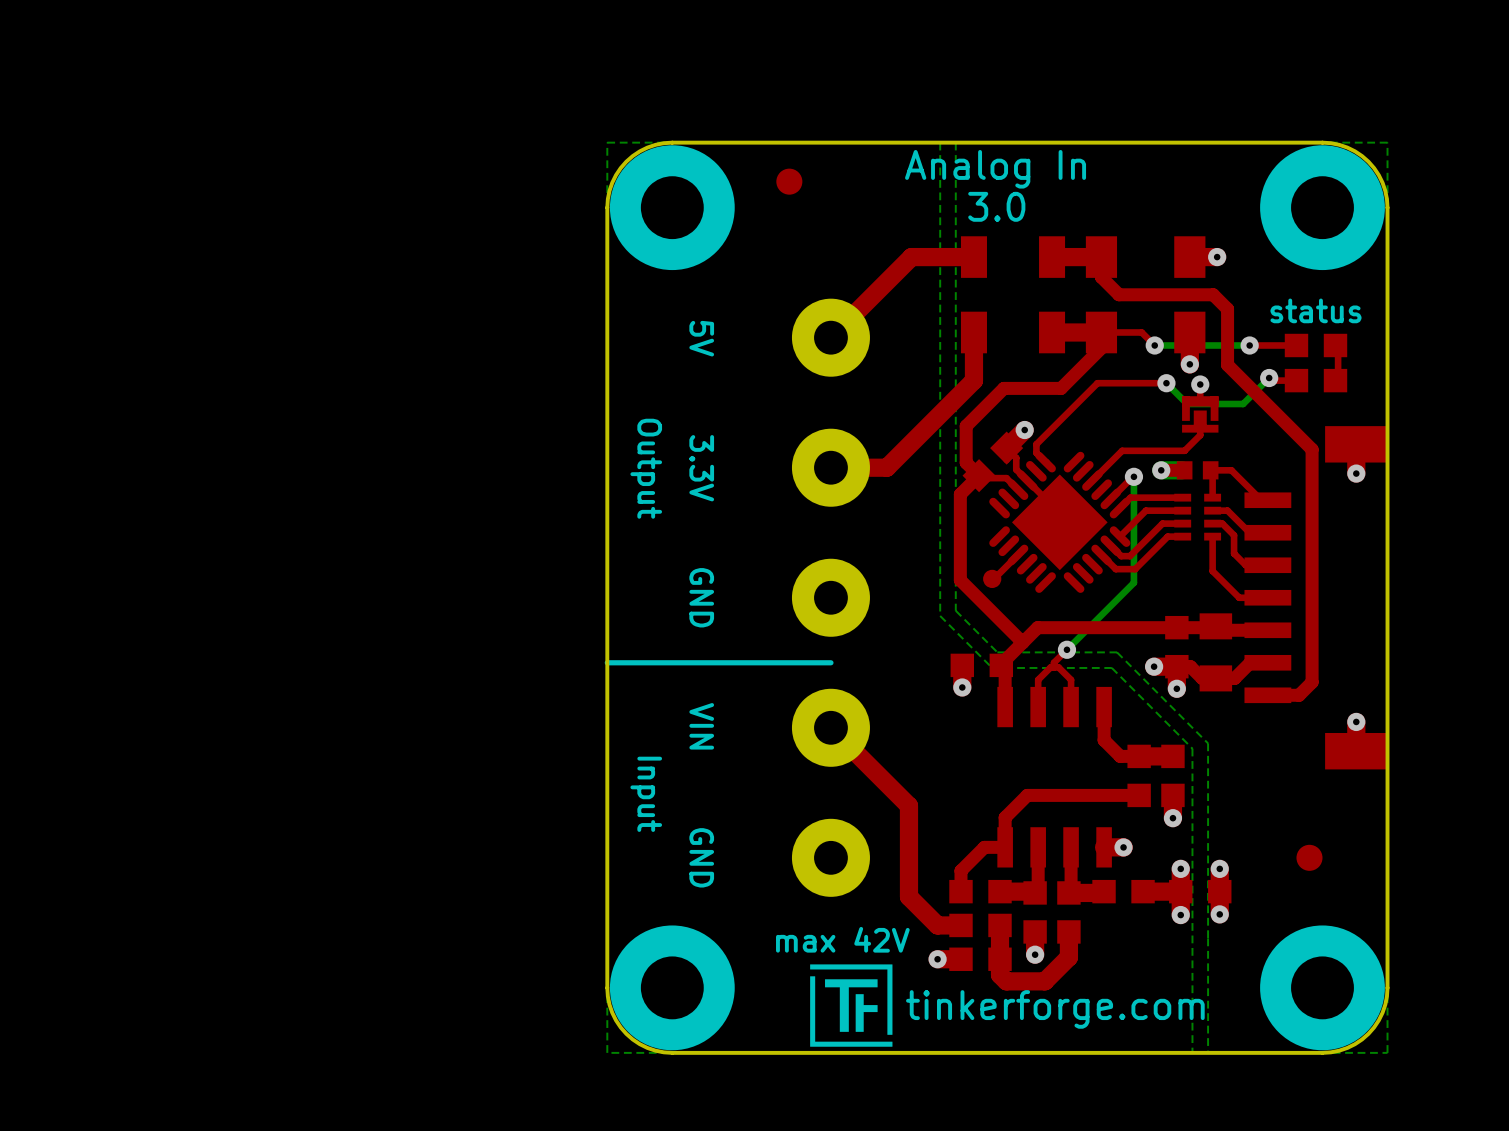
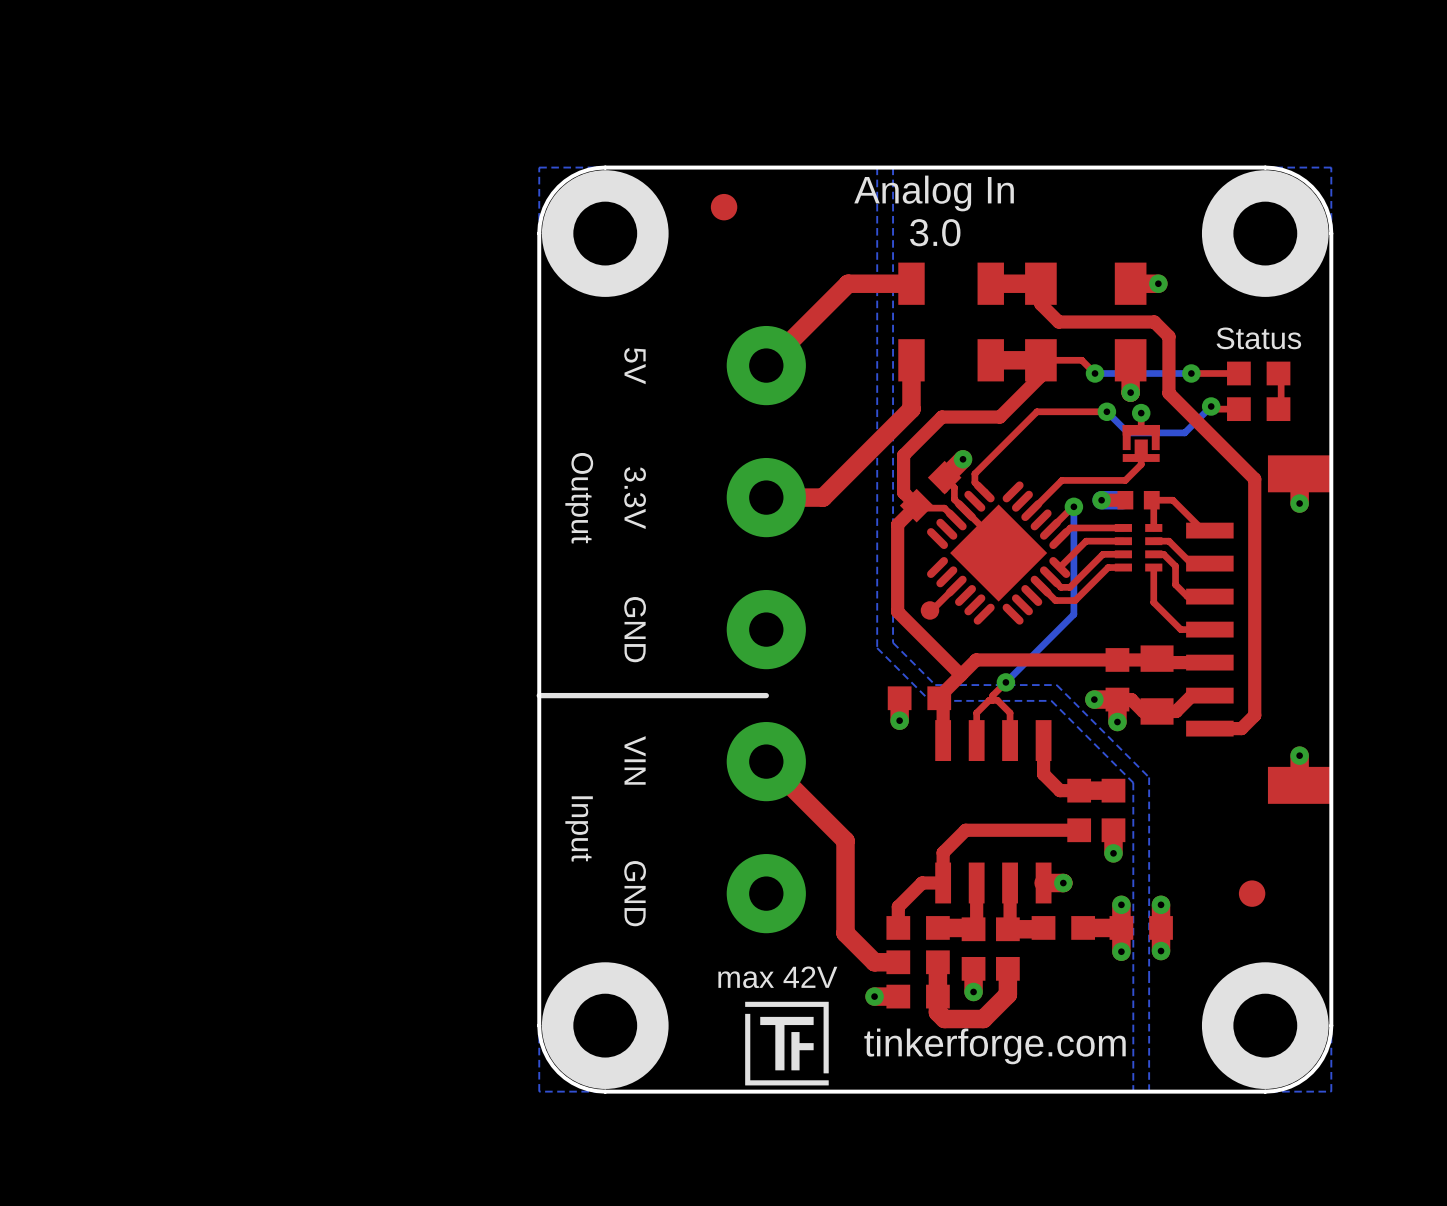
text: status (1315, 310) -> Status (1258, 338)

